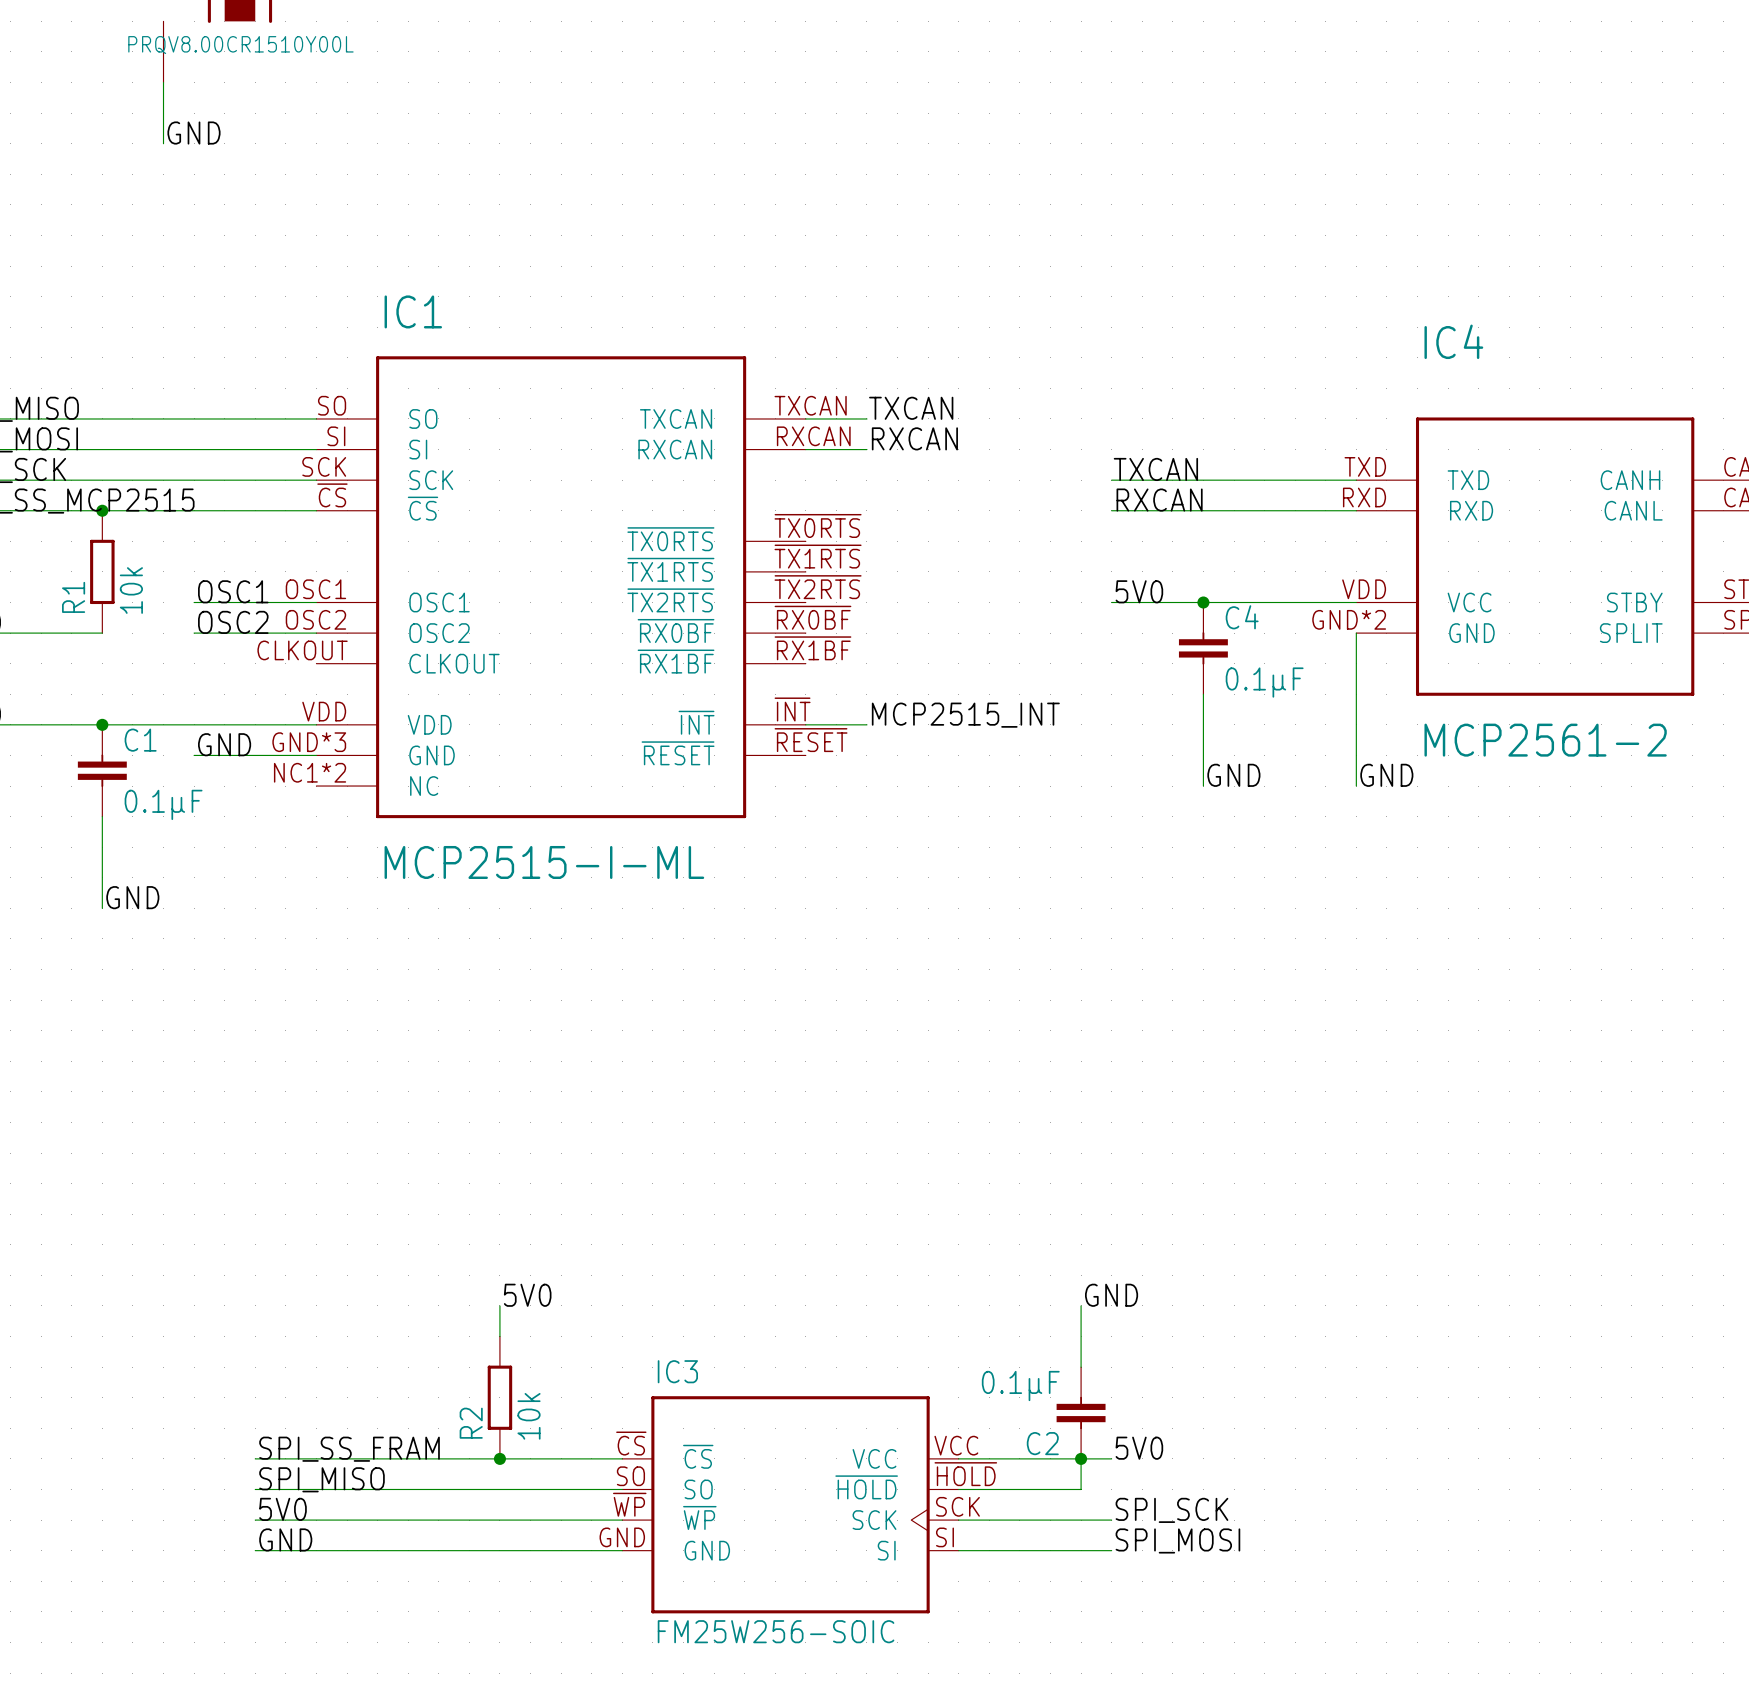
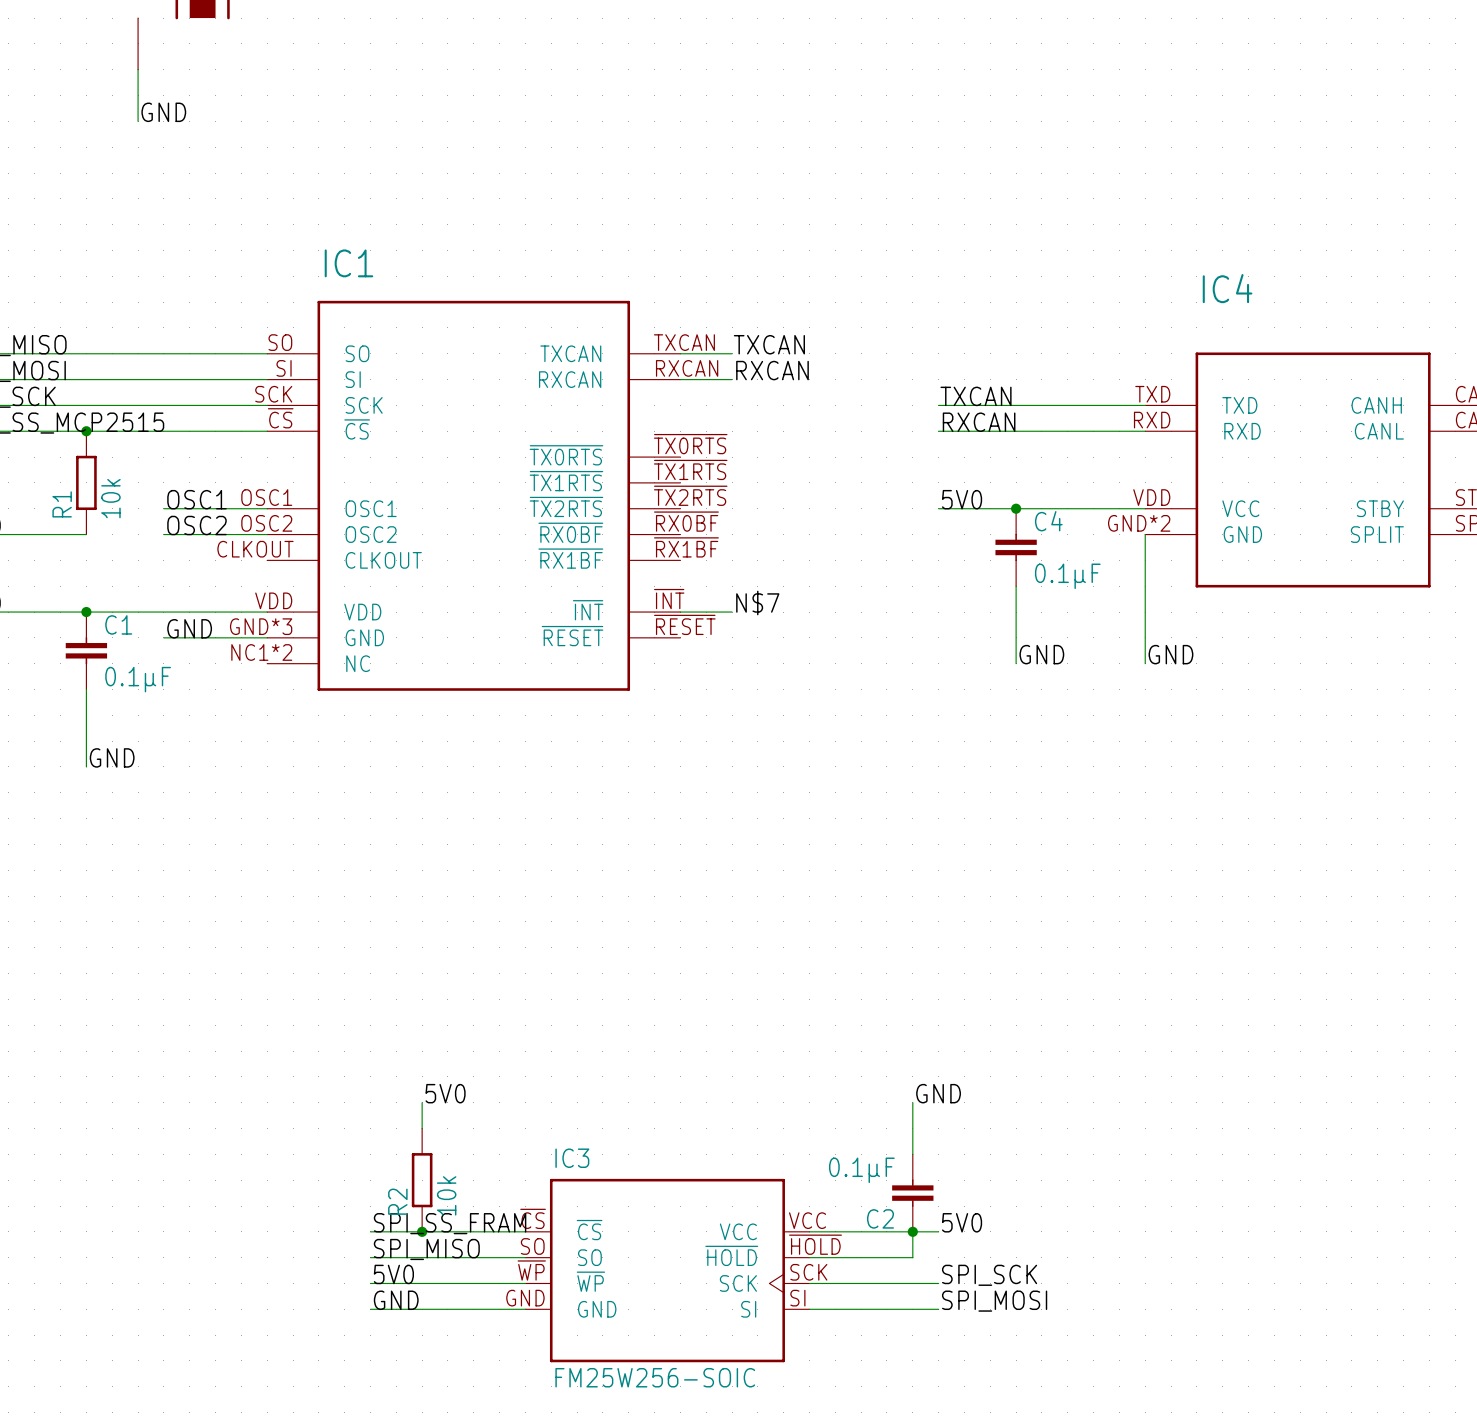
part value: PRQV8.00CR1510Y00L (240, 45) -> none
label: MCP2515_INT (965, 715) -> N$7 (757, 602)
IC4 value: MCP2561-2 (1545, 740) -> none
IC1 value: MCP2515-I-ML (544, 862) -> none
label position: SPI_SS_FRAM (349, 1449) -> SPI_SS_FRAM (450, 1223)
wire: (255, 1458) (438, 1458) -> none
label position: SPI_MISO (321, 1479) -> SPI_MISO (426, 1249)
wire: (255, 1489) (438, 1489) -> none
label position: 5V0 (283, 1509) -> 5V0 (393, 1274)
wire: (255, 1520) (438, 1520) -> none
label position: GND (285, 1539) -> GND (396, 1300)
wire: (255, 1550) (438, 1550) -> none

